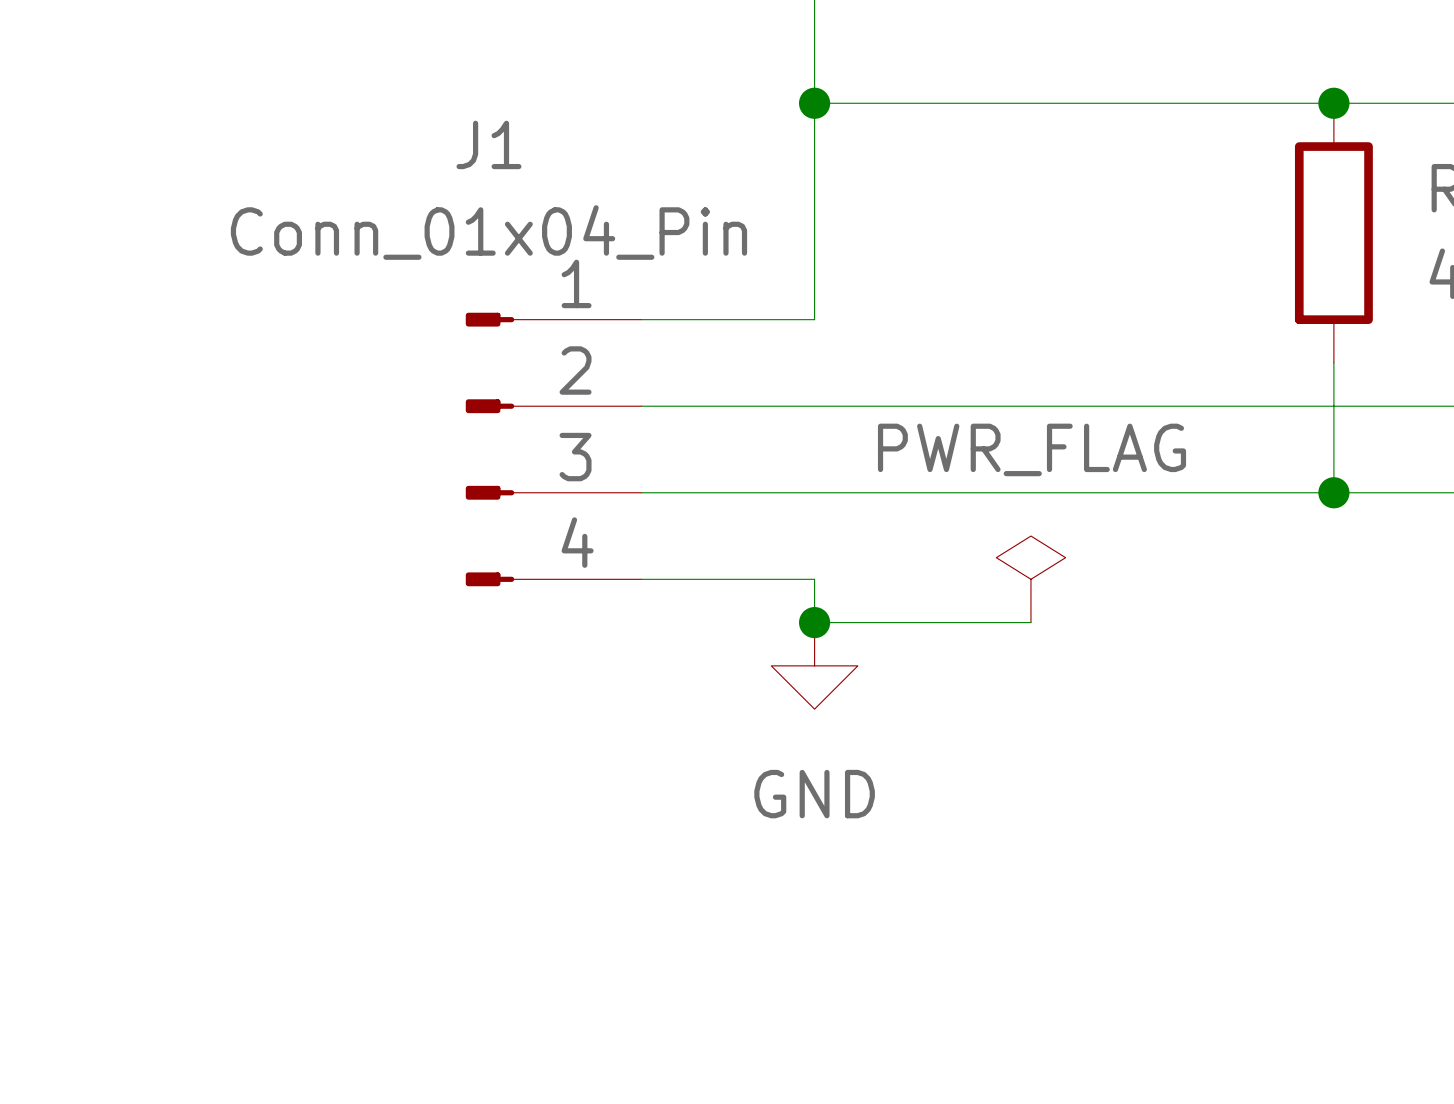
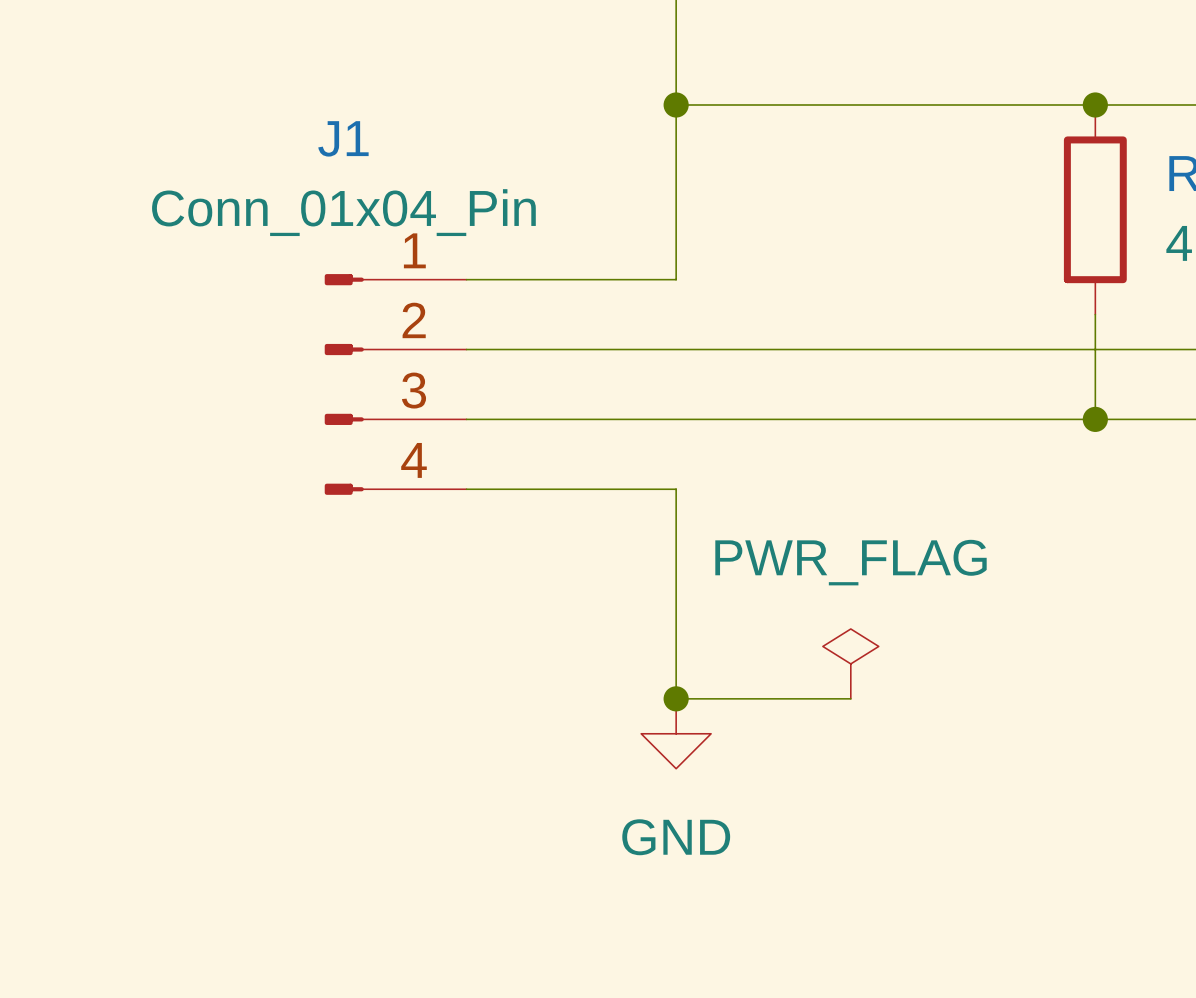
J1 position: (553, 449) -> (395, 384)
power symbol position: PWR_FLAG (1030, 579) -> PWR_FLAG (850, 663)
wire: (814, 622) (1030, 622) -> (676, 524) (676, 698) (850, 698)
junction: (814, 622) -> none
power symbol position: GND (814, 665) -> GND (676, 733)
junction: none -> (676, 698)

